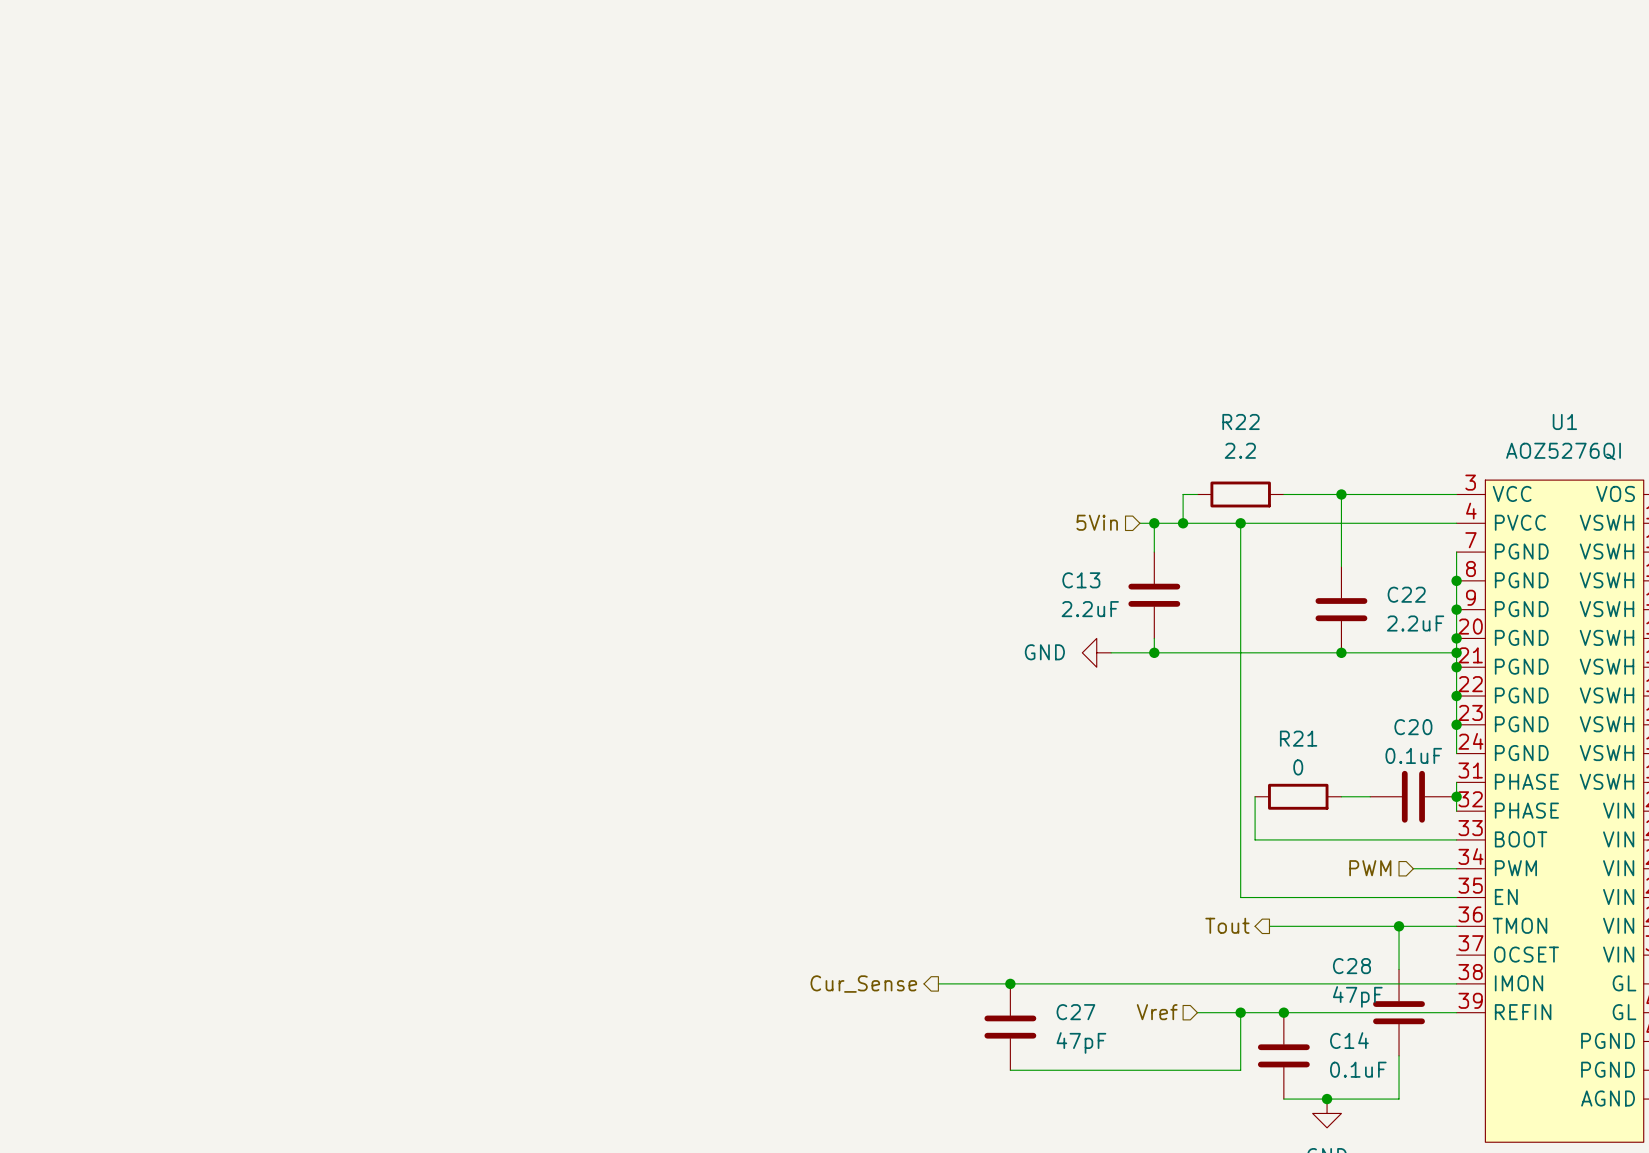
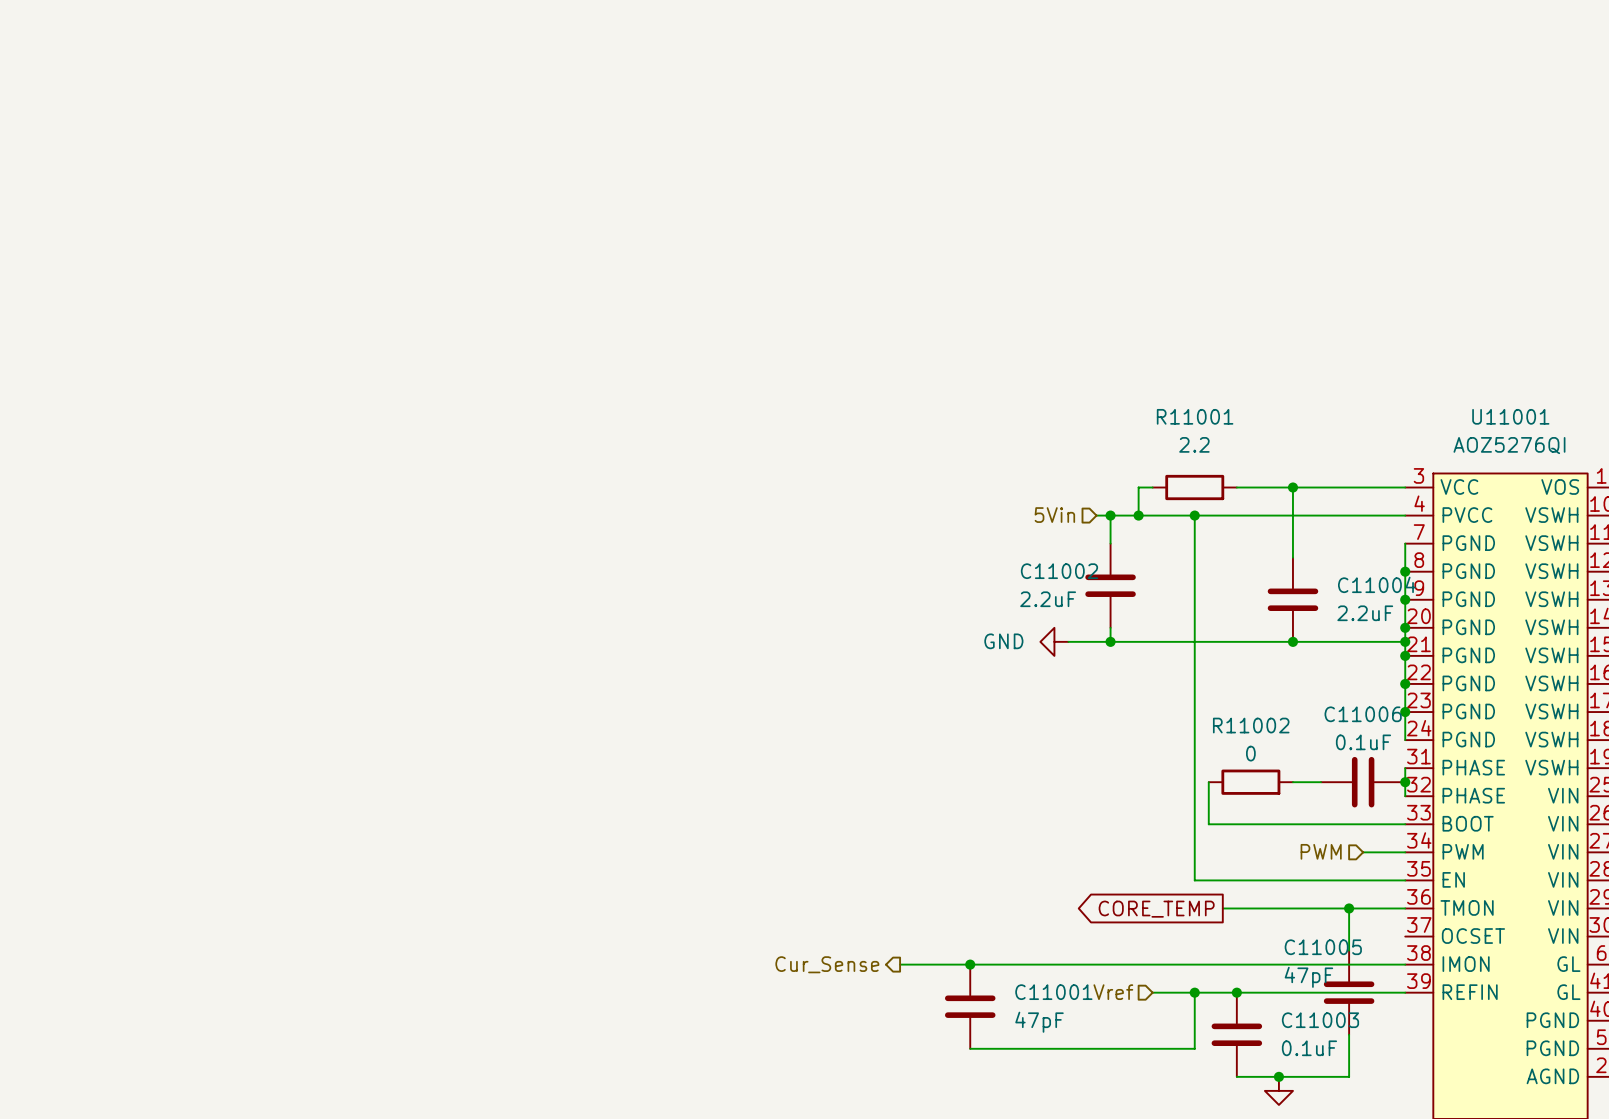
R22 name: R22 (1241, 421) -> R11001 (1195, 416)
U1 name: U1 (1564, 421) -> U11001 (1510, 416)
C13 name: C13 (1081, 580) -> C11002 (1059, 571)
C22 name: C22 (1406, 594) -> C11004 (1376, 584)
C20 name: C20 (1413, 727) -> C11006 (1363, 714)
R21 name: R21 (1298, 738) -> R11002 (1251, 725)
hierarchical label: Tout (1227, 925) -> none
global label: none -> CORE_TEMP (1156, 909)
C28 name: C28 (1351, 966) -> C11005 (1323, 947)
C27 name: C27 (1075, 1012) -> C11001 (1053, 992)
C14 name: C14 (1349, 1040) -> C11003 (1320, 1020)

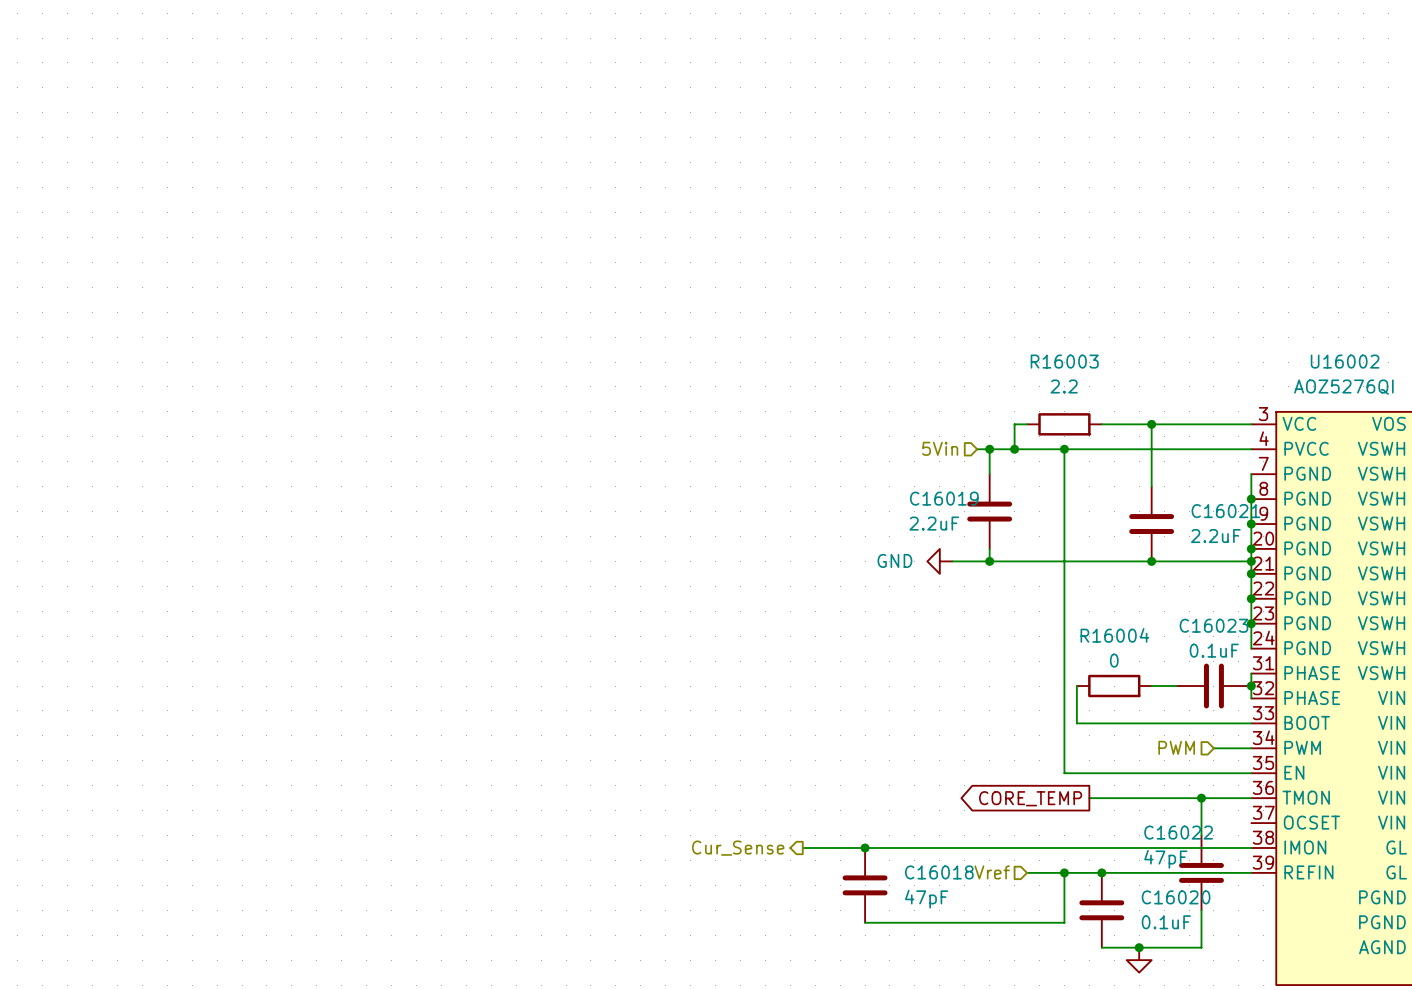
R11001 name: R11001 (1195, 416) -> R16003 (1064, 361)
U11001 name: U11001 (1510, 416) -> U16002 (1345, 361)
C11002 name: C11002 (1059, 571) -> C16019 (944, 498)
C11004 name: C11004 (1376, 584) -> C16021 (1225, 511)
C11006 name: C11006 (1363, 714) -> C16023 (1213, 625)
R11002 name: R11002 (1251, 725) -> R16004 (1114, 635)
C11005 name: C11005 (1323, 947) -> C16022 (1178, 832)
C11001 name: C11001 (1053, 992) -> C16018 (939, 872)
C11003 name: C11003 (1320, 1020) -> C16020 (1176, 897)

